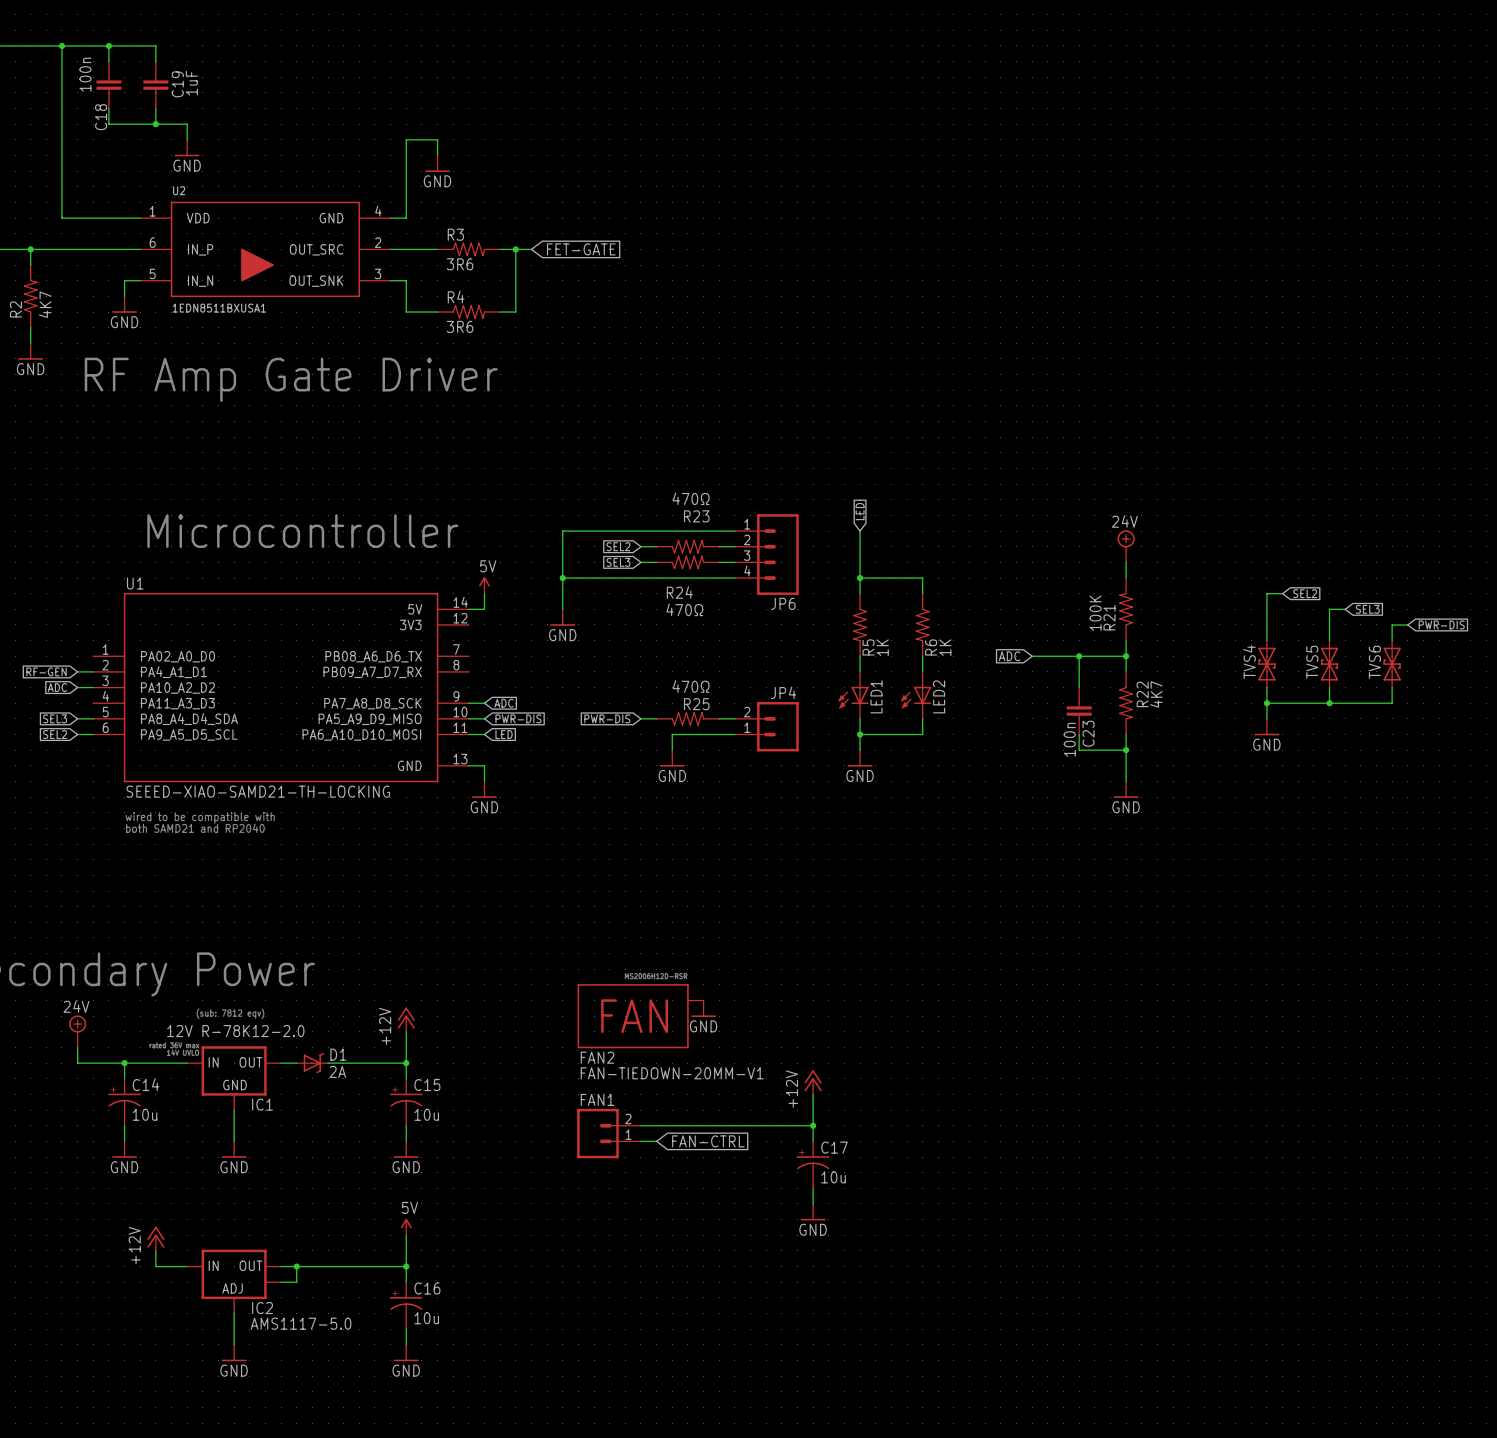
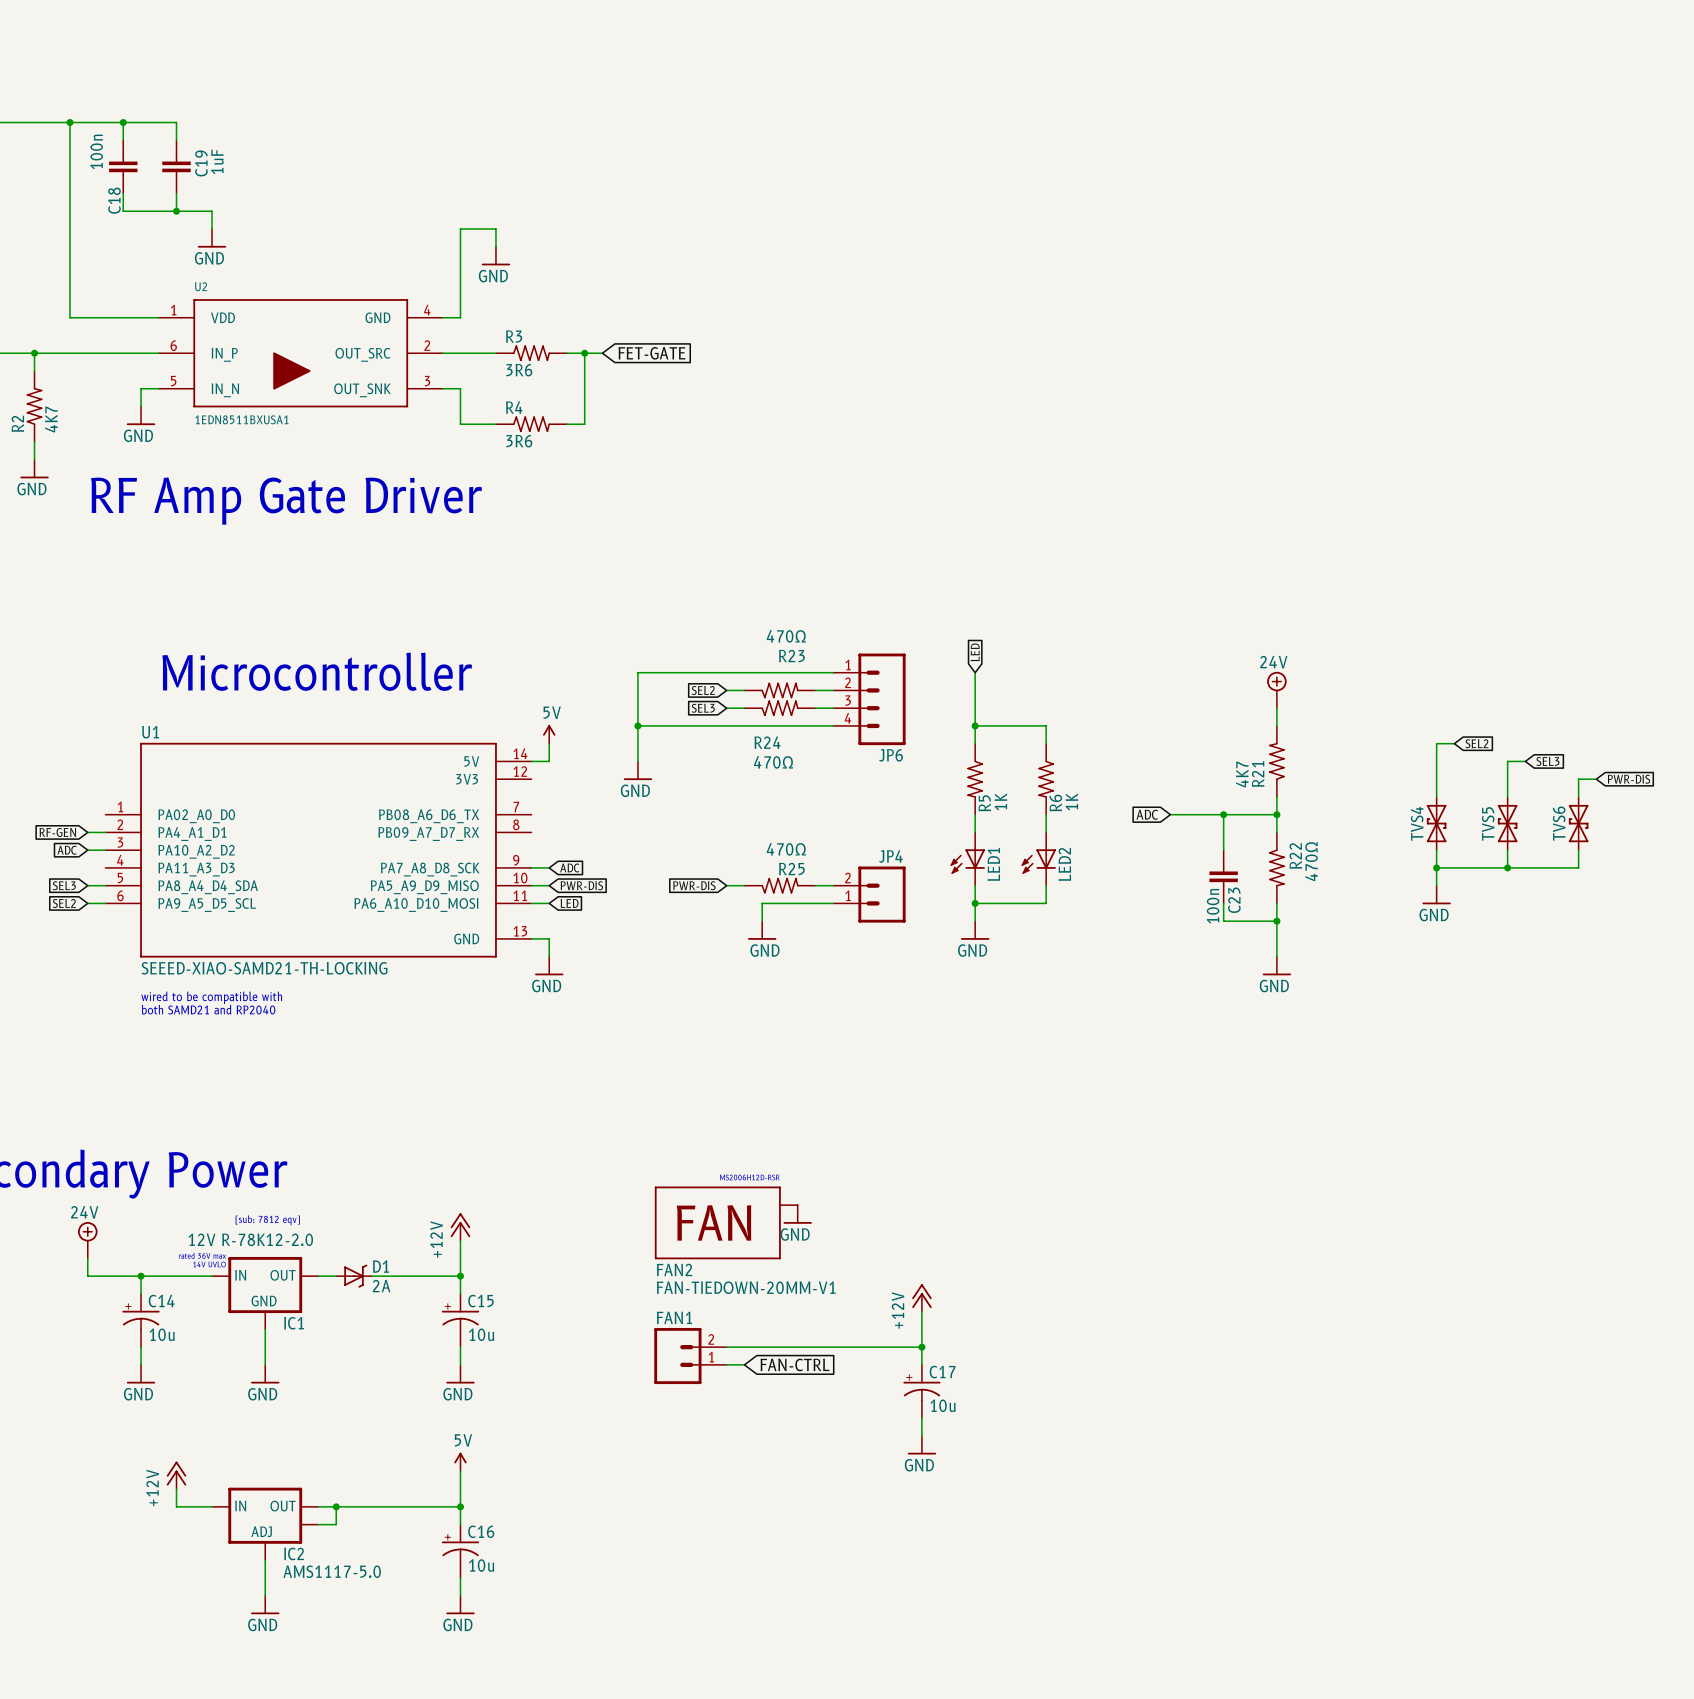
R21 value: 100K (1095, 613) -> 4K7 (1242, 774)
R22 value: 4K7 (1156, 694) -> 470Ω (1311, 861)

